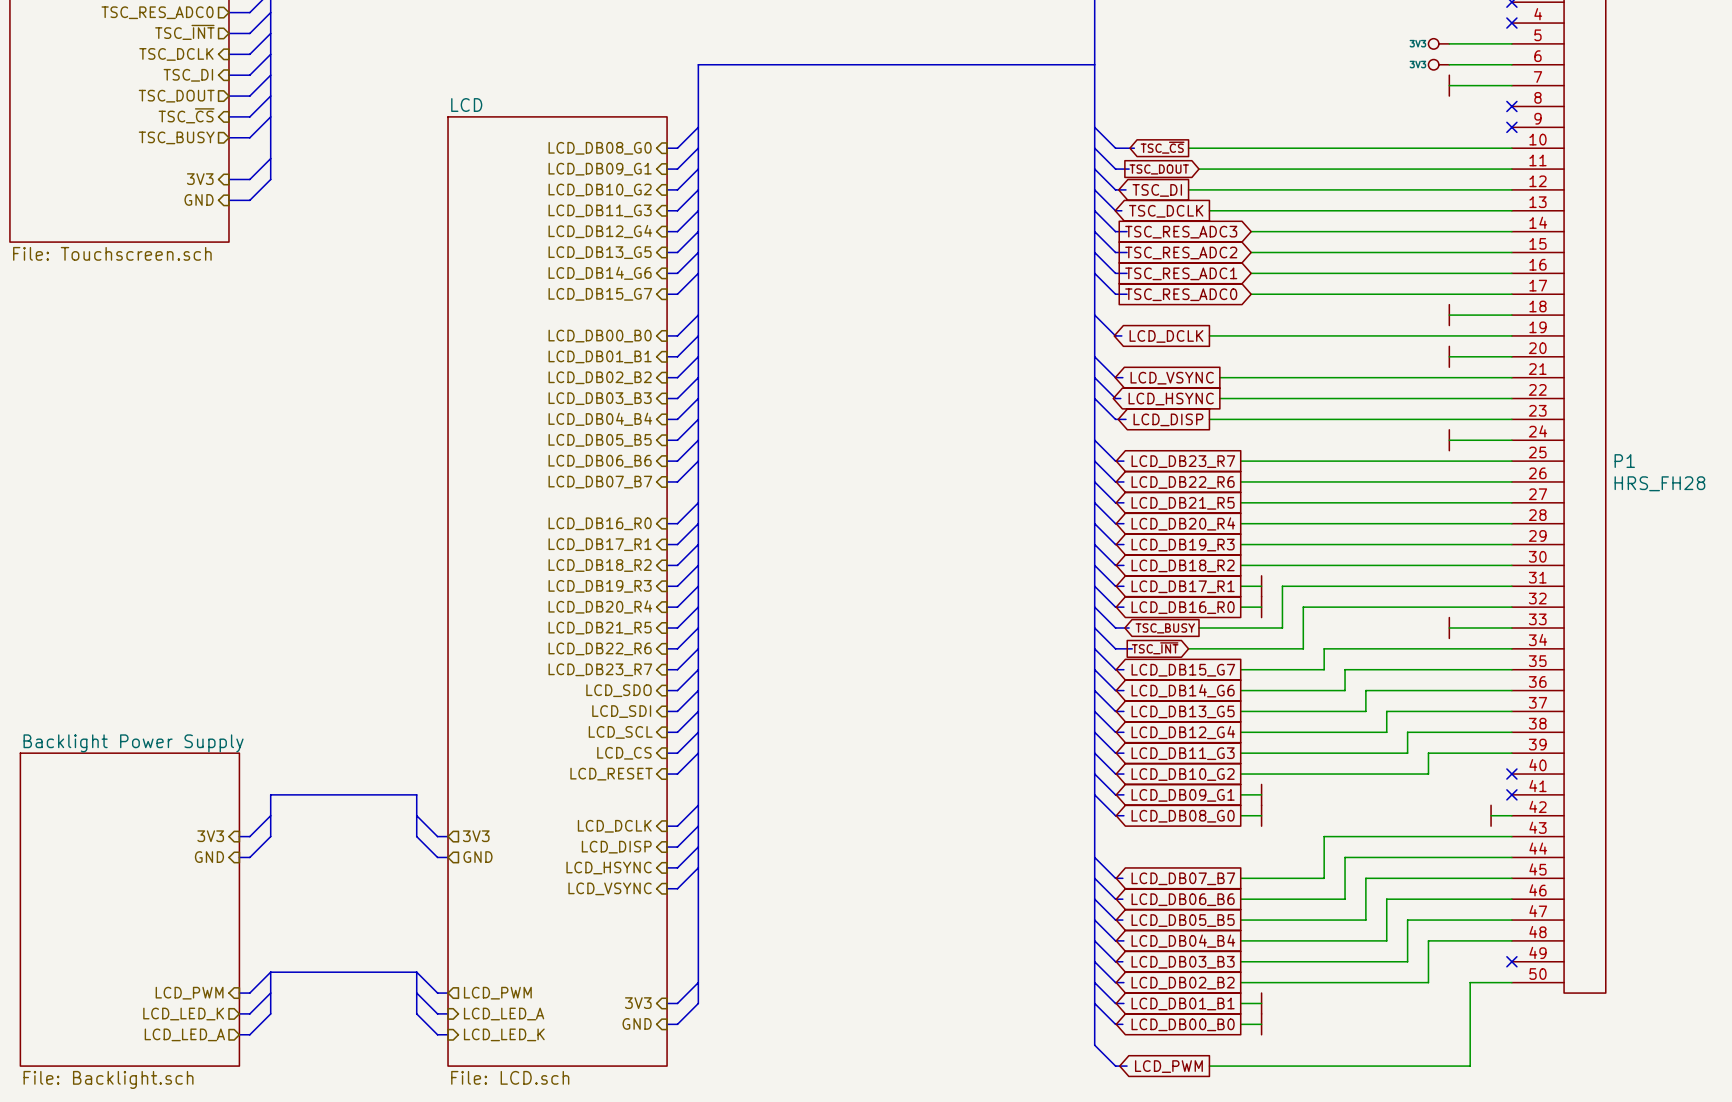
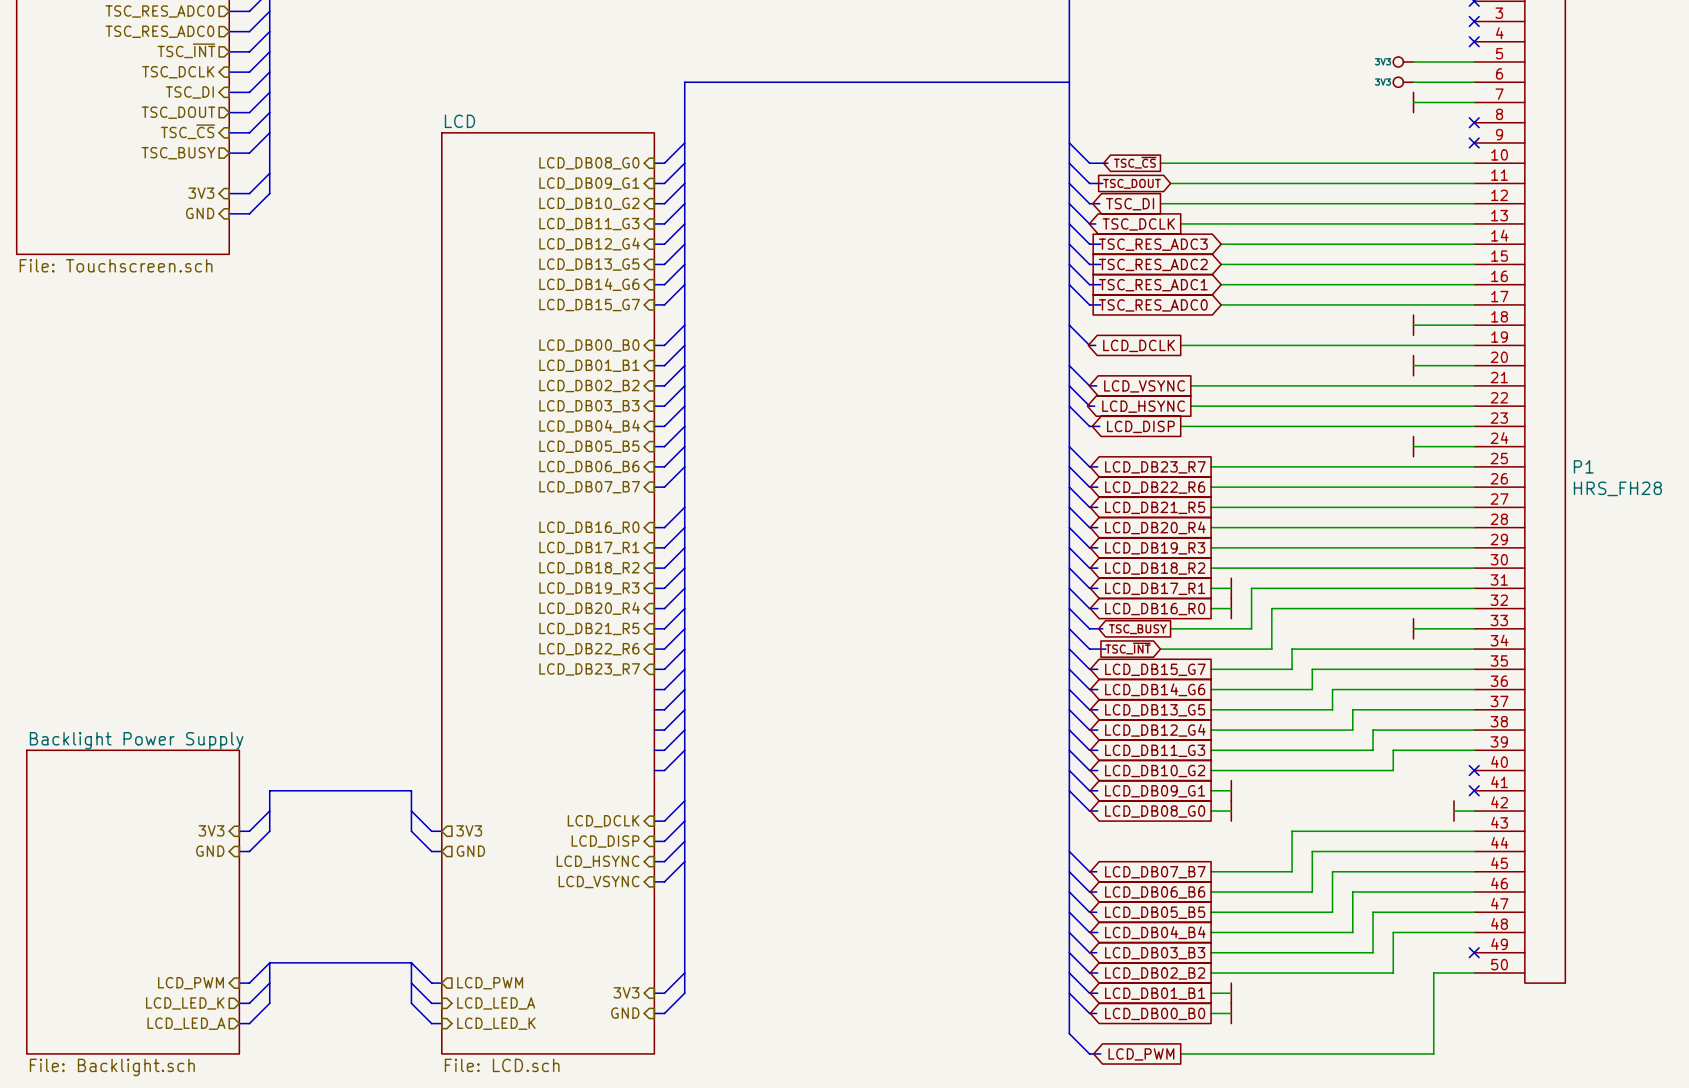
hierarchical label: LCD_SDO (618, 690) -> none
hierarchical label: LCD_SDI (621, 711) -> none
hierarchical label: LCD_SCL (620, 732) -> none
hierarchical label: LCD_CS (624, 753) -> none
hierarchical label: LCD_RESET (611, 774) -> none

